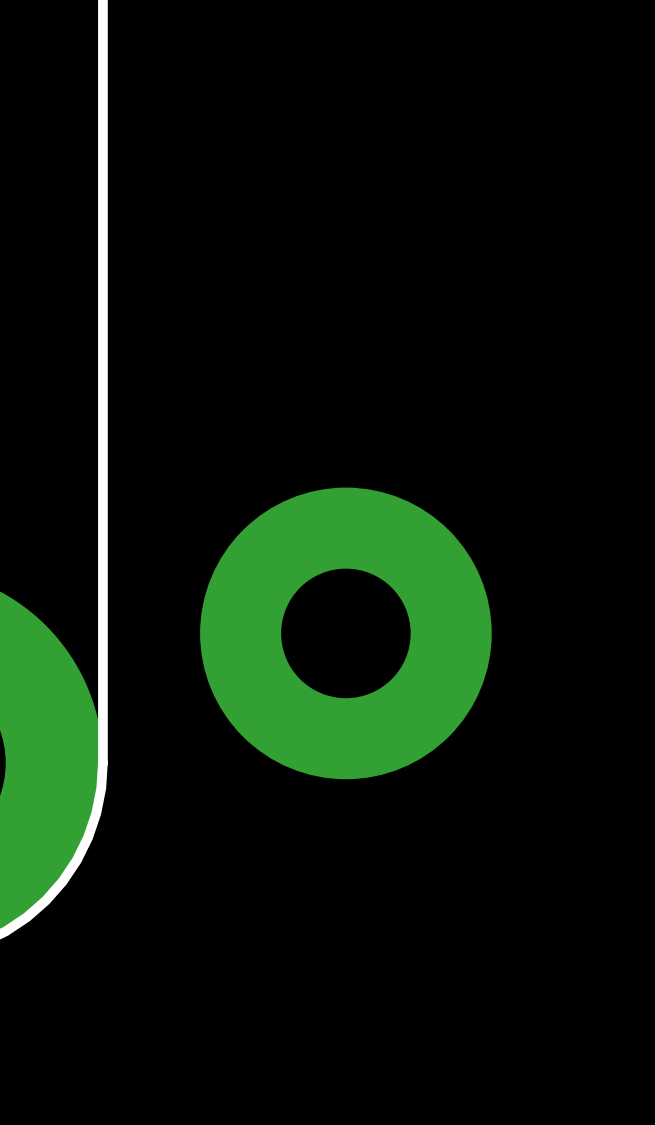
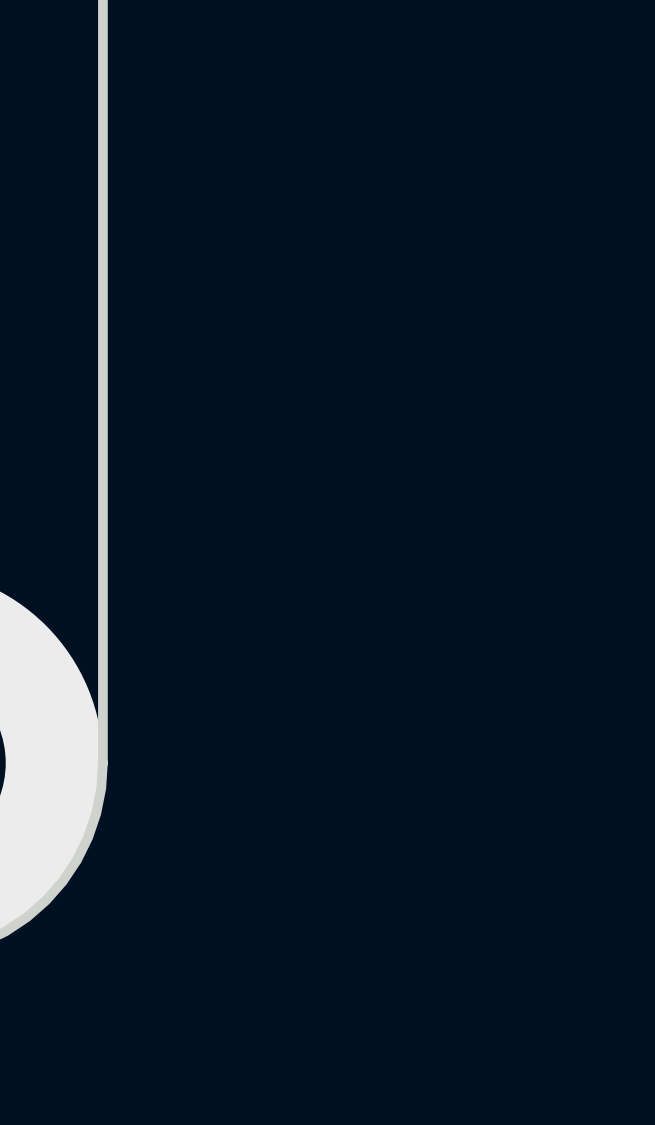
part: (345, 633) -> none

